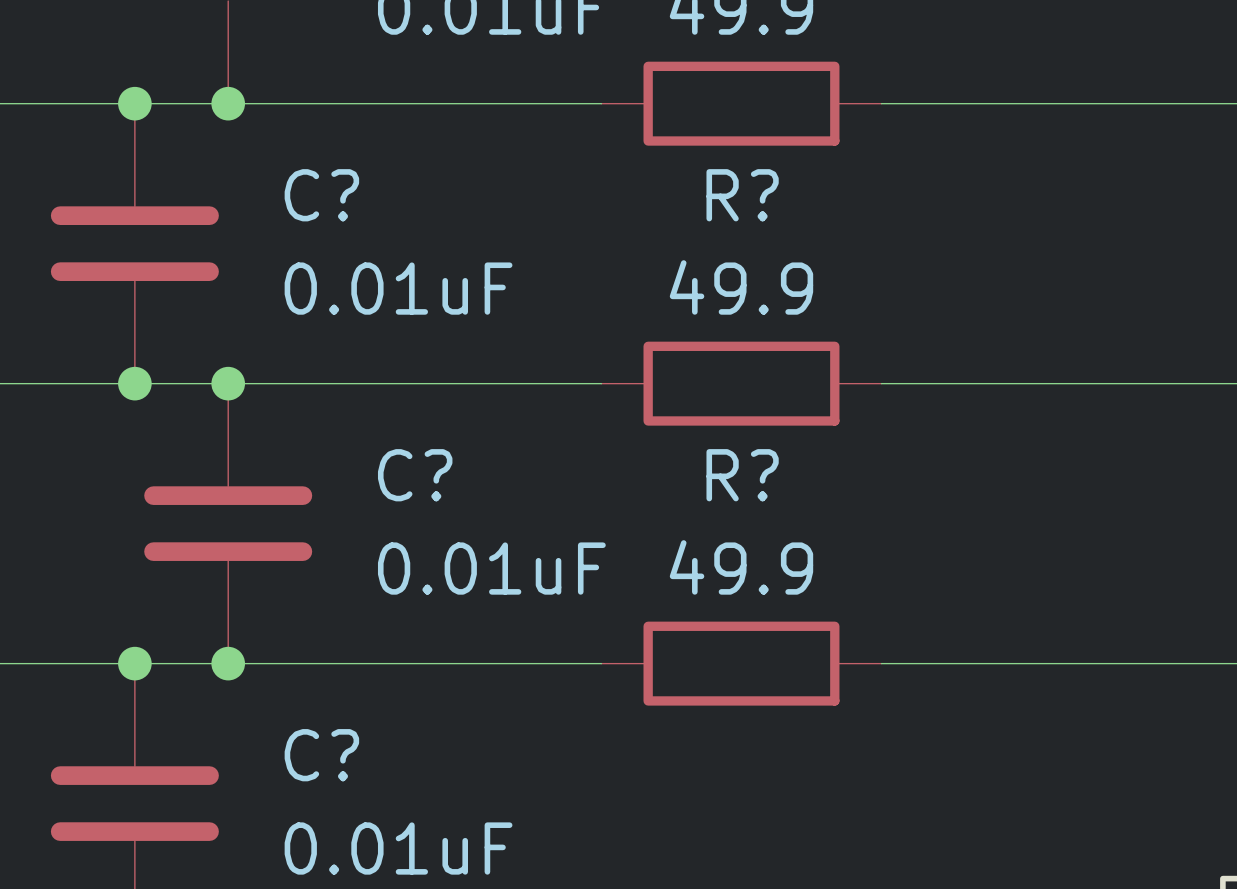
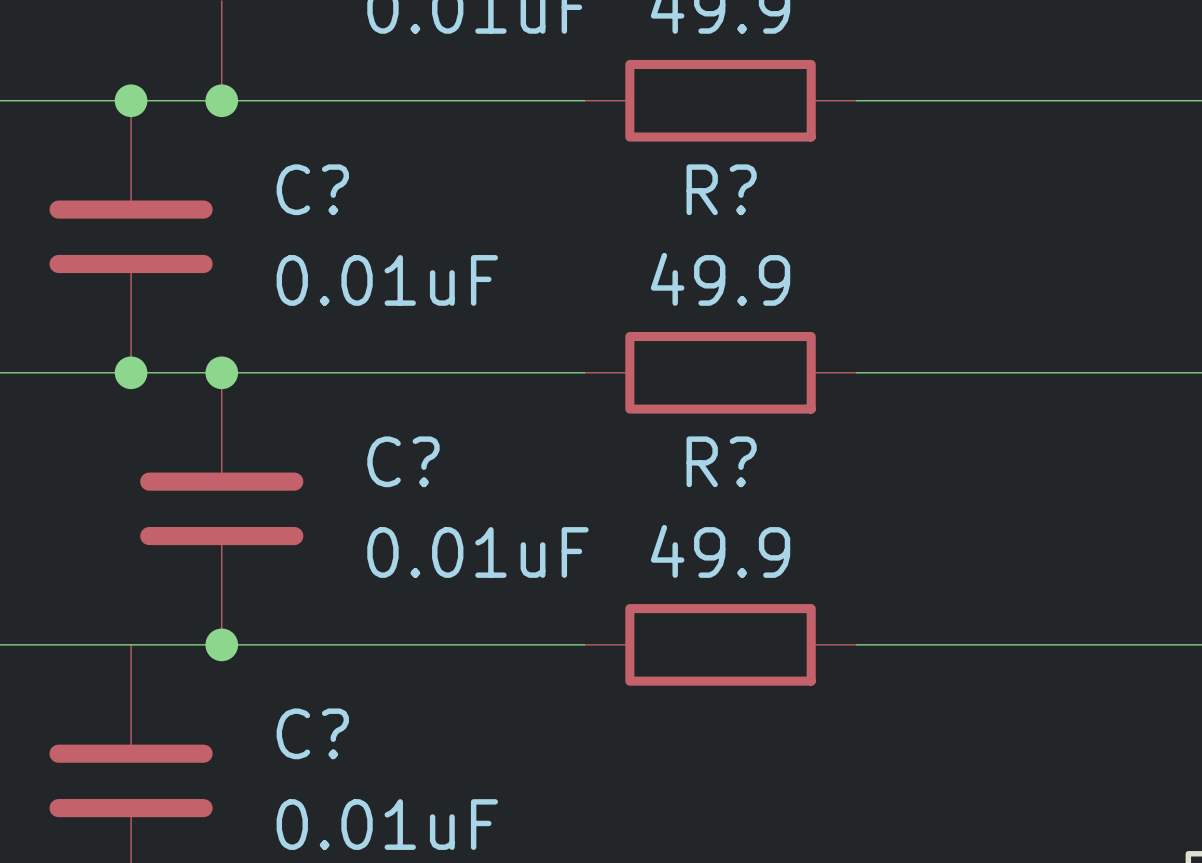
junction: (134, 663) -> none

